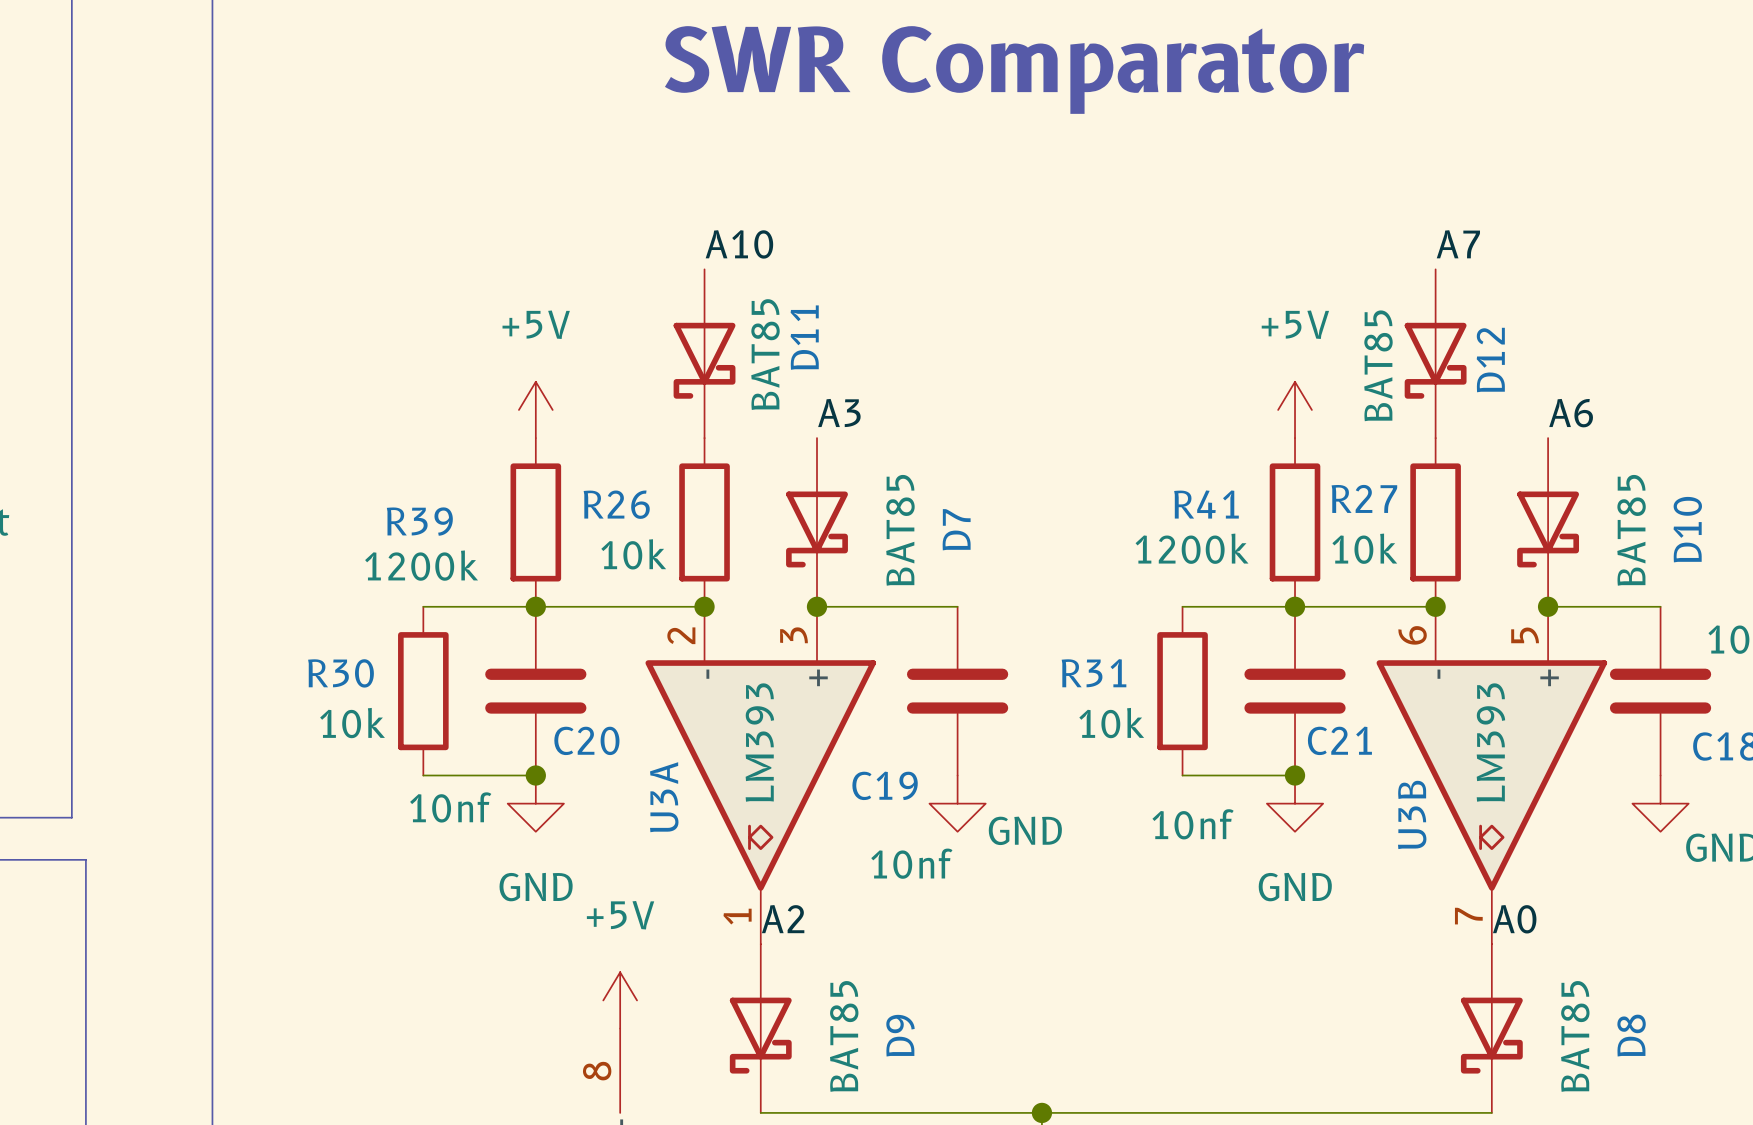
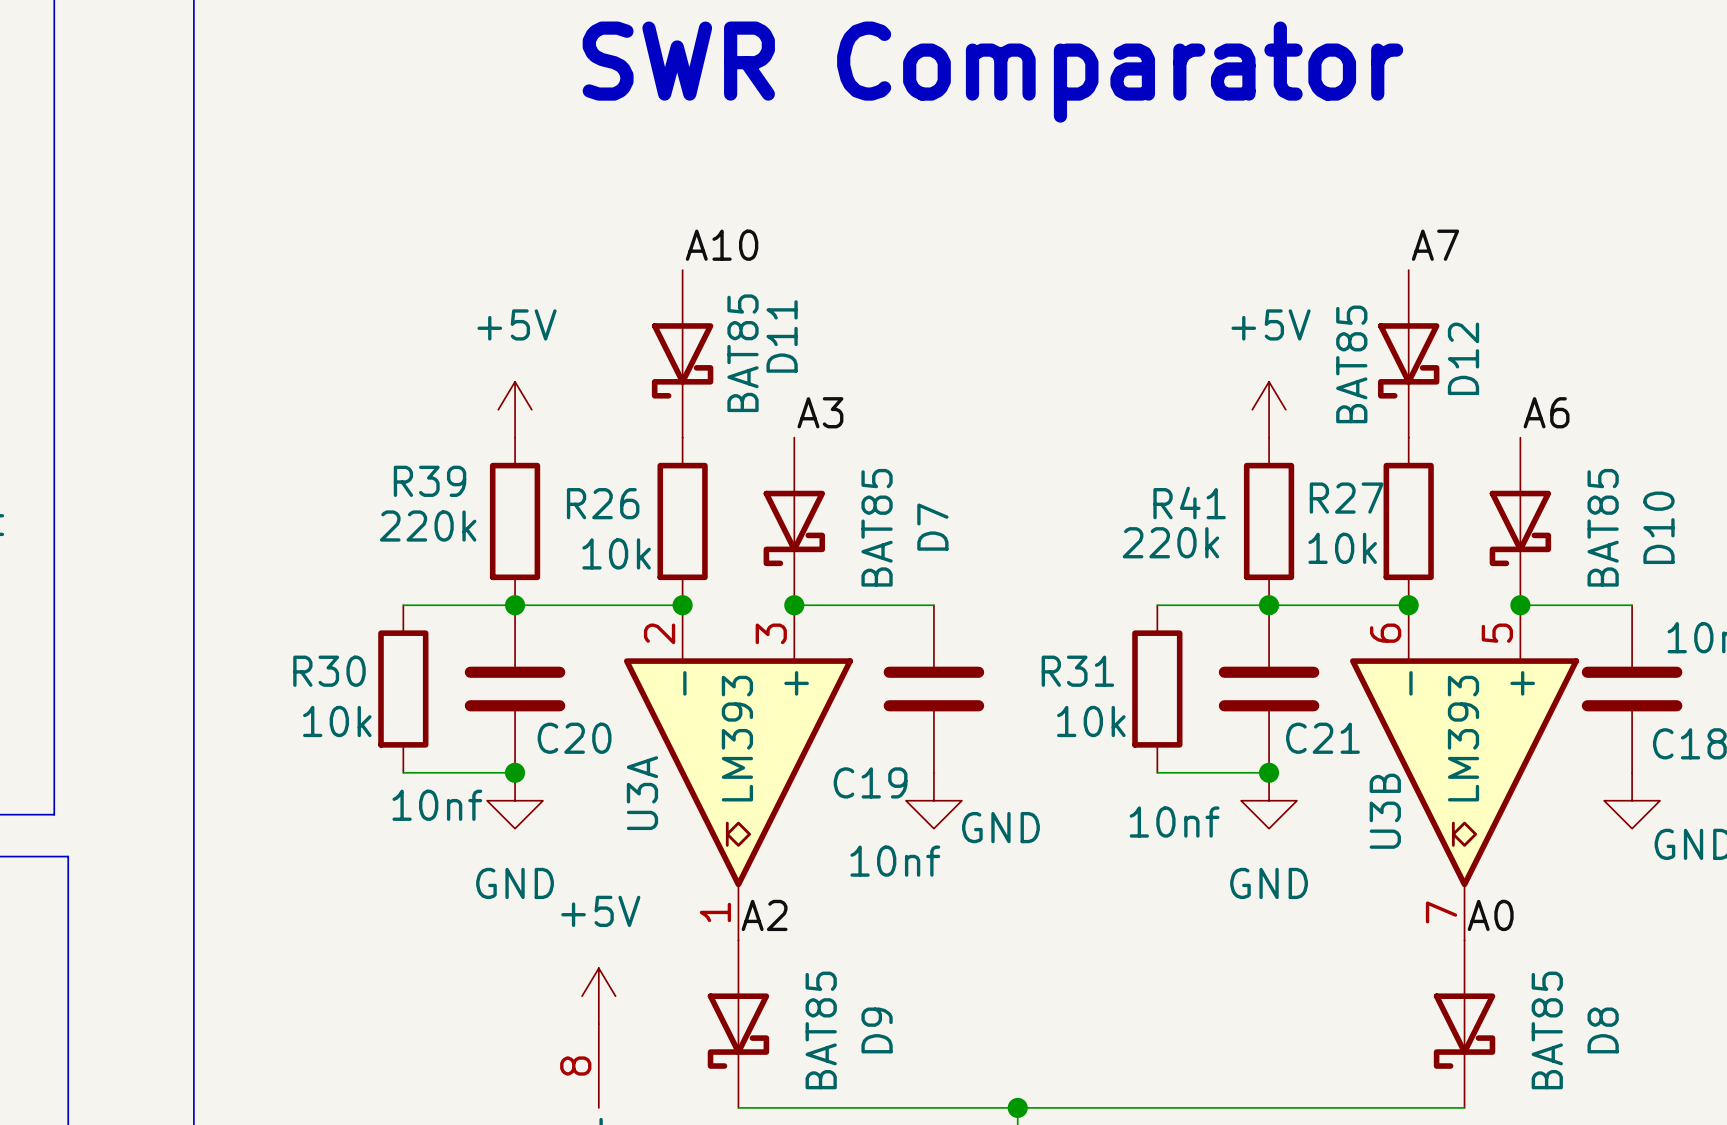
R39 name position: R39 (419, 521) -> R39 (430, 481)
R41 value: 1200k (1192, 548) -> 220k (1170, 542)
R39 value: 1200k (421, 565) -> 220k (428, 526)

